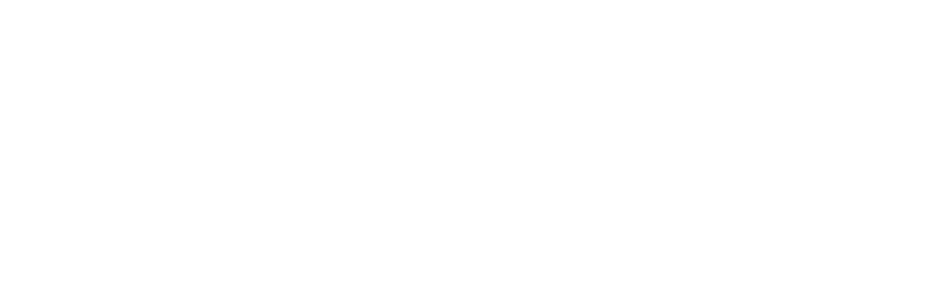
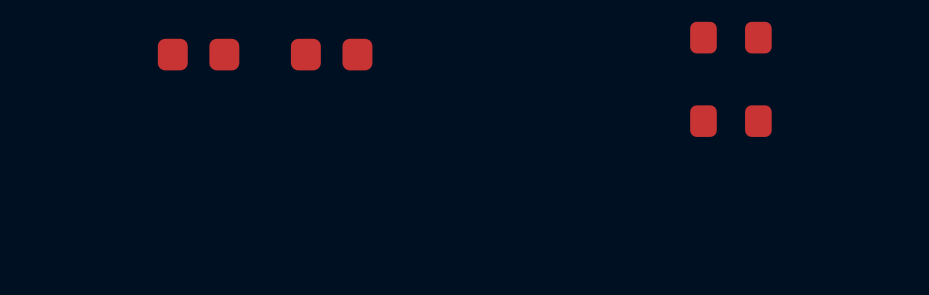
part: none -> (730, 37)
part: none -> (198, 54)
part: none -> (331, 54)
part: none -> (730, 121)

